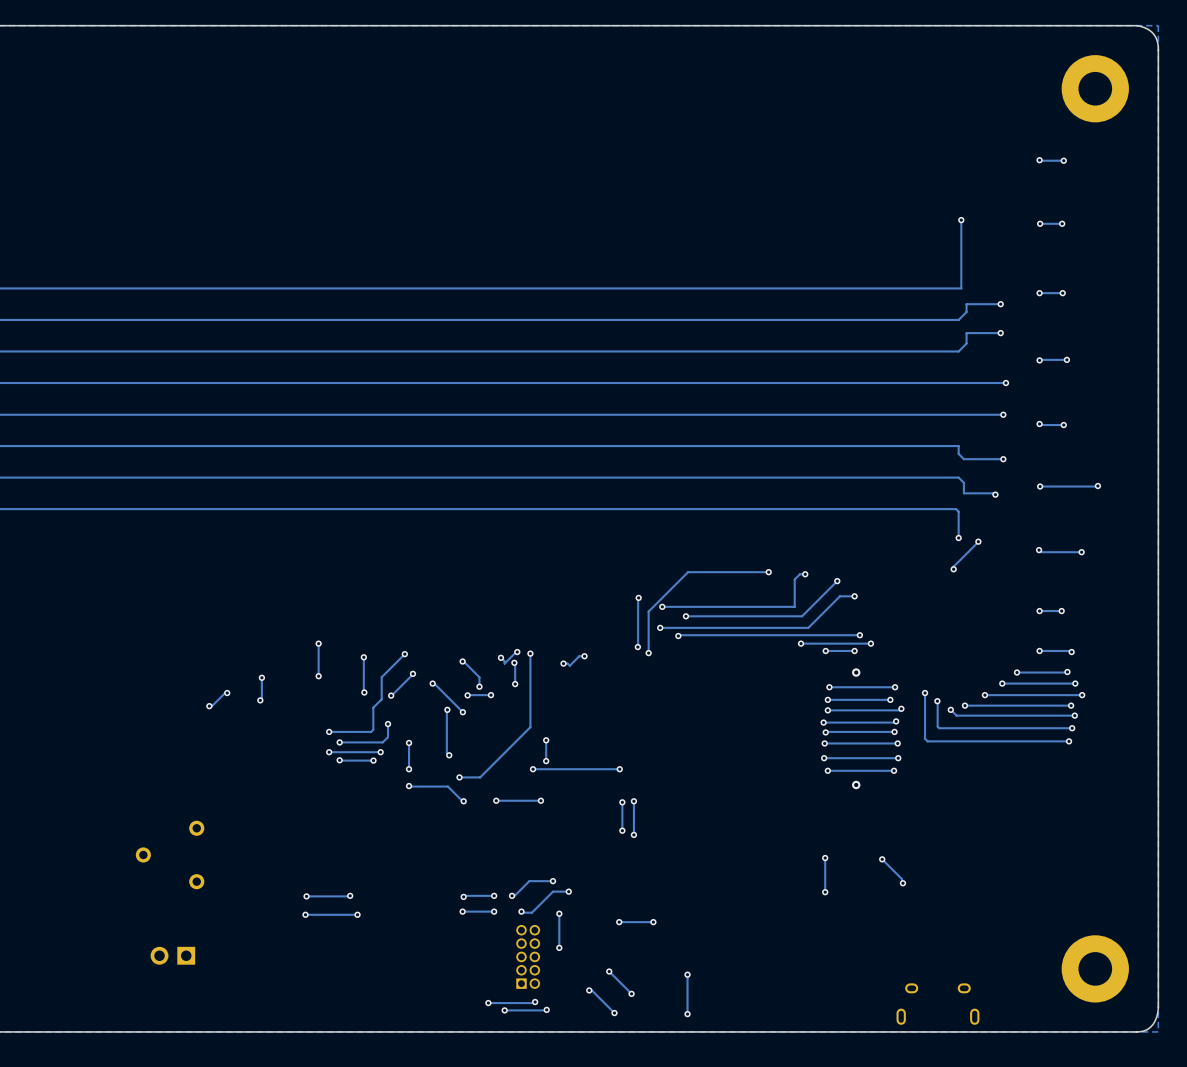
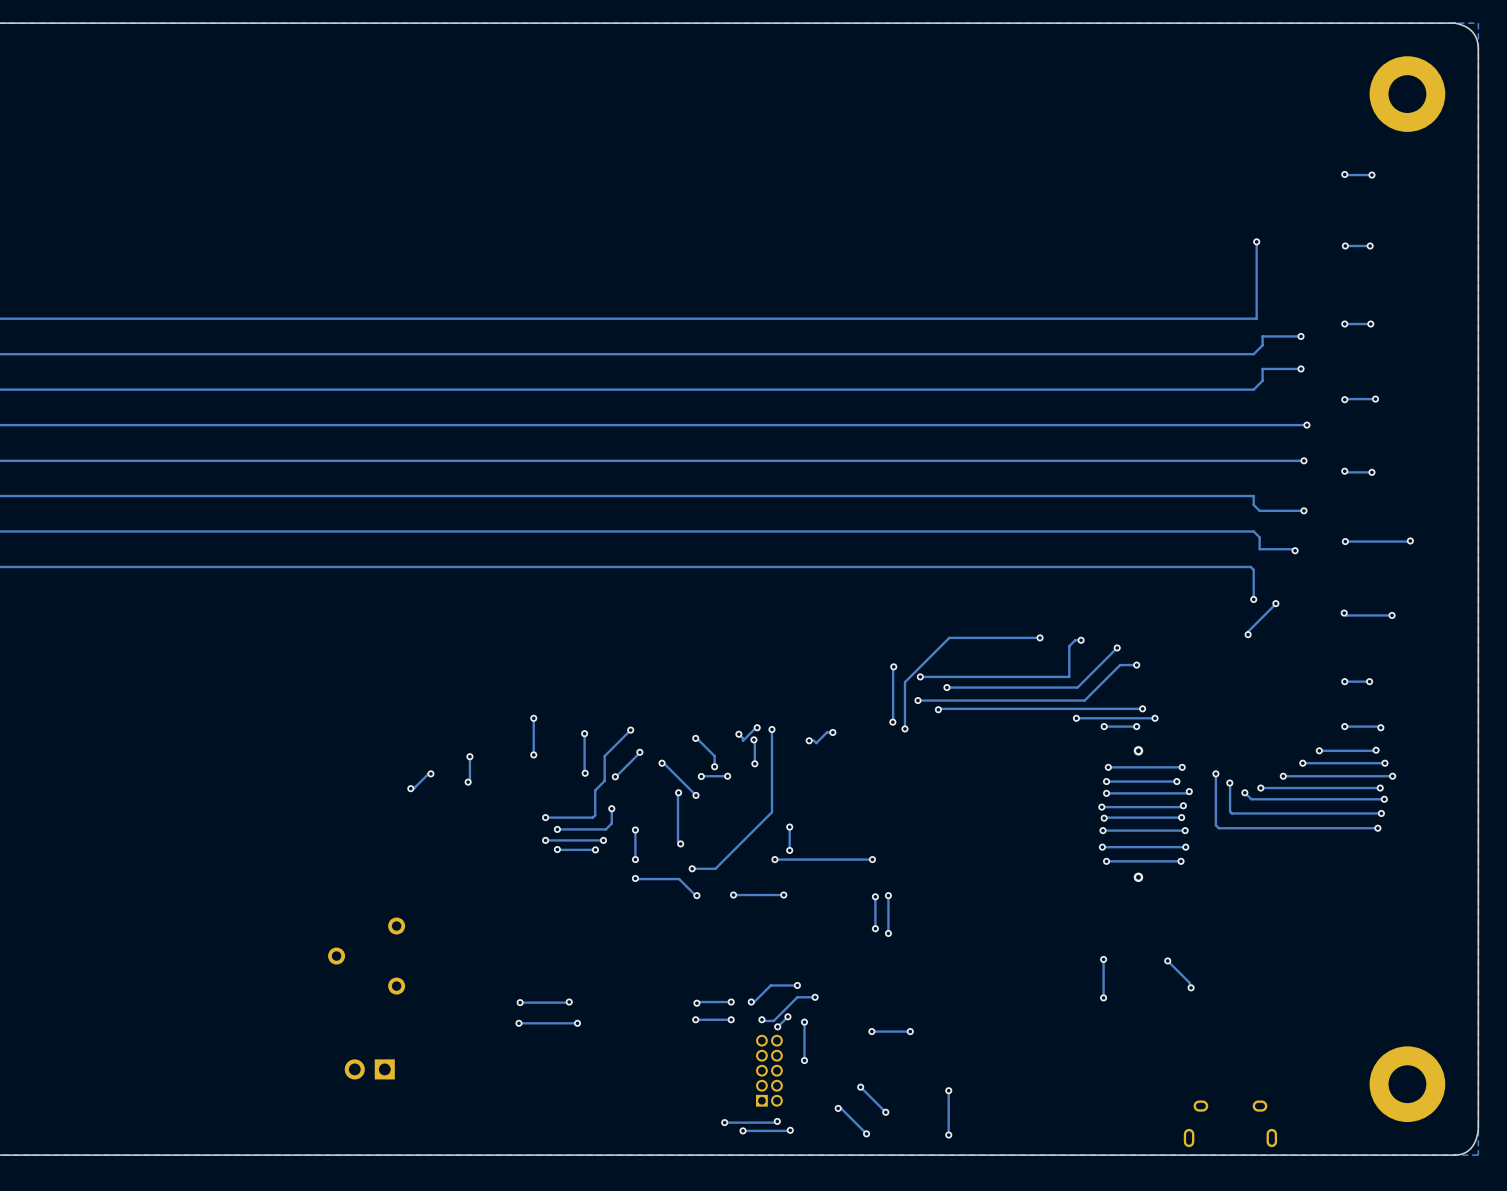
track: none -> (787, 1016) (778, 1026)
via: none -> (787, 1016)
via: none -> (777, 1026)

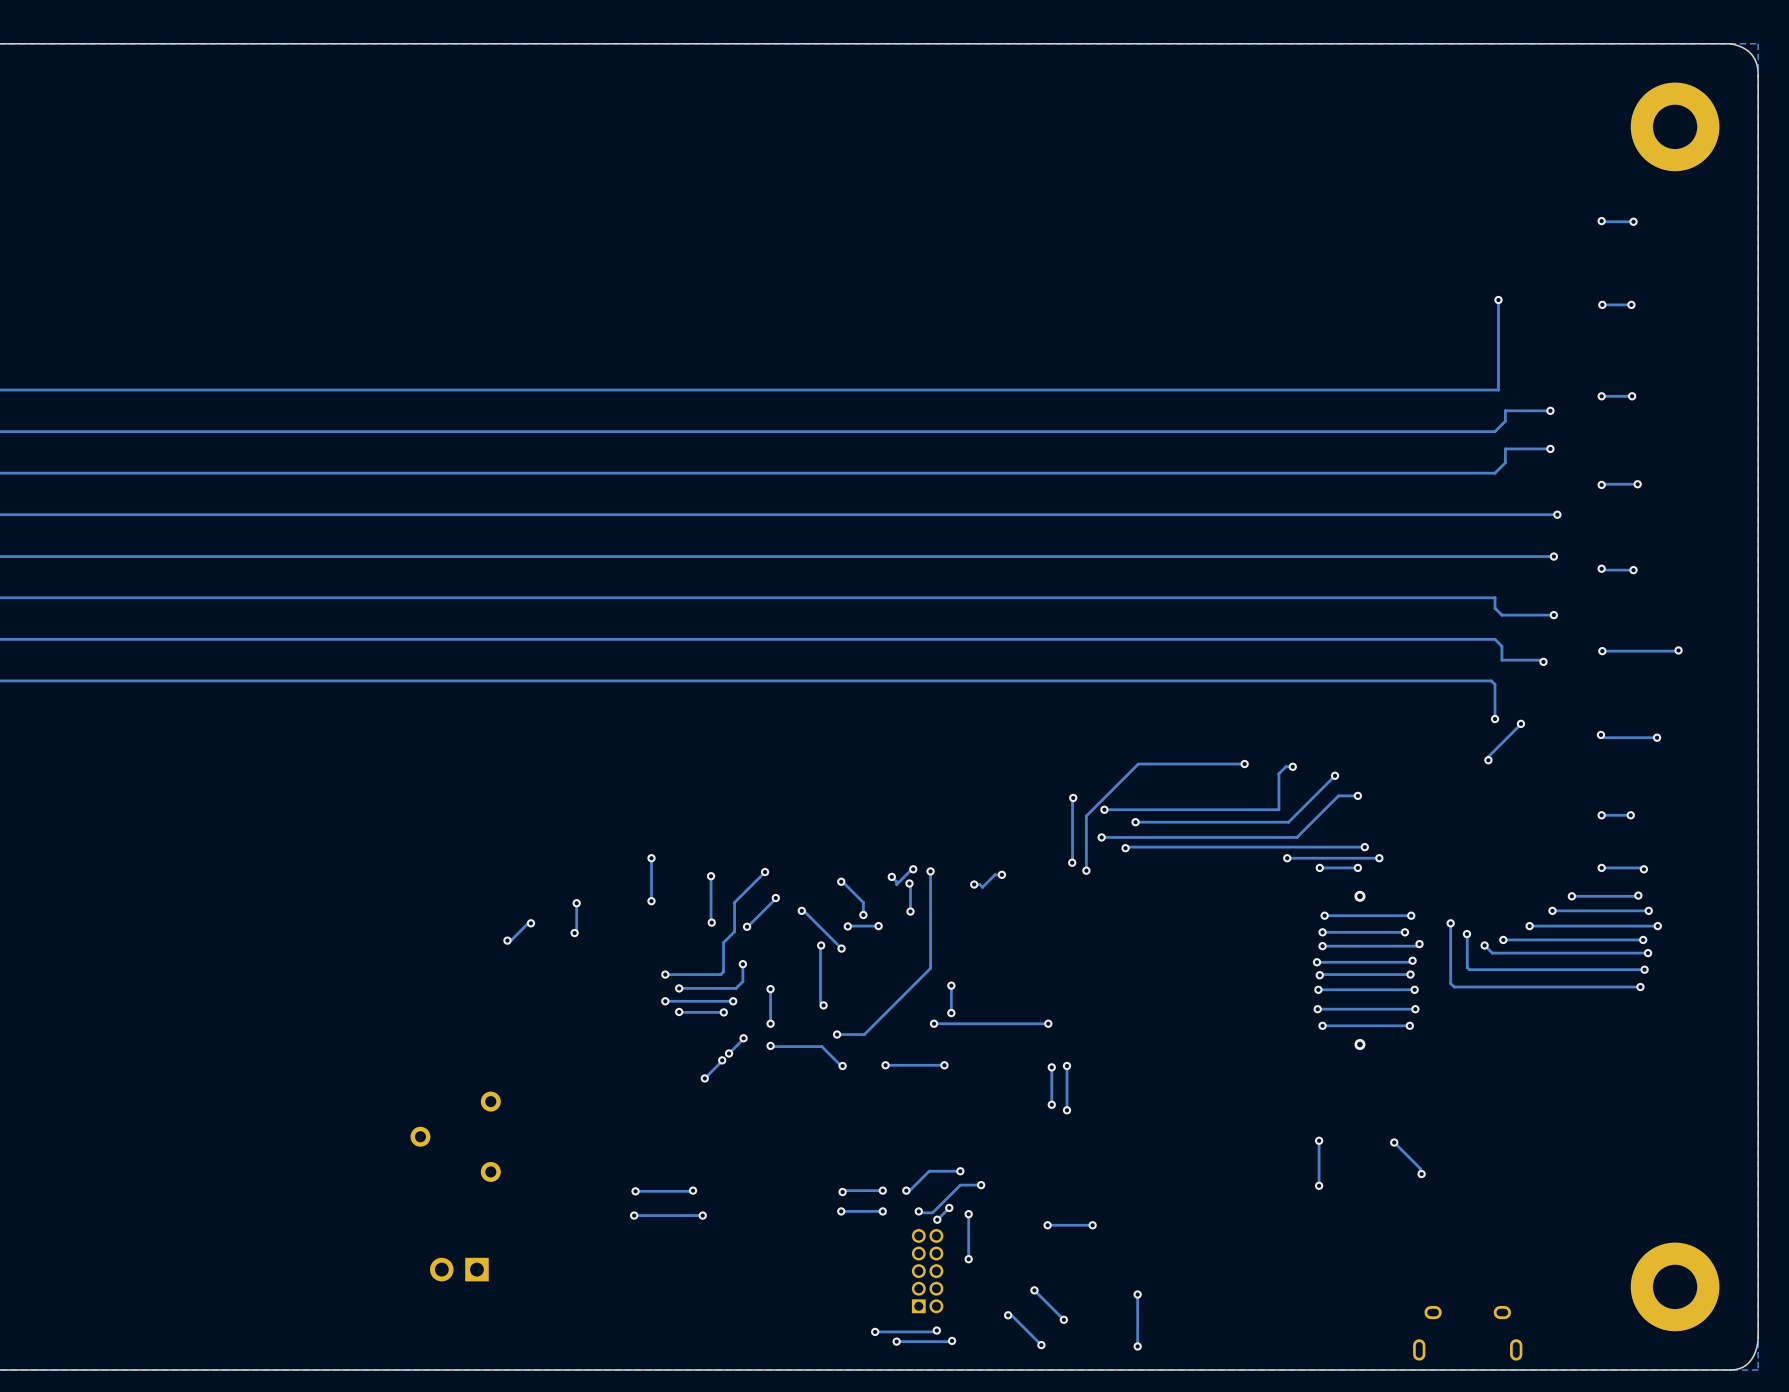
track: none -> (743, 1038) (729, 1053)
via: none -> (743, 1038)
via: none -> (729, 1053)
track: none -> (722, 1060) (704, 1078)
via: none -> (722, 1060)
via: none -> (704, 1078)

